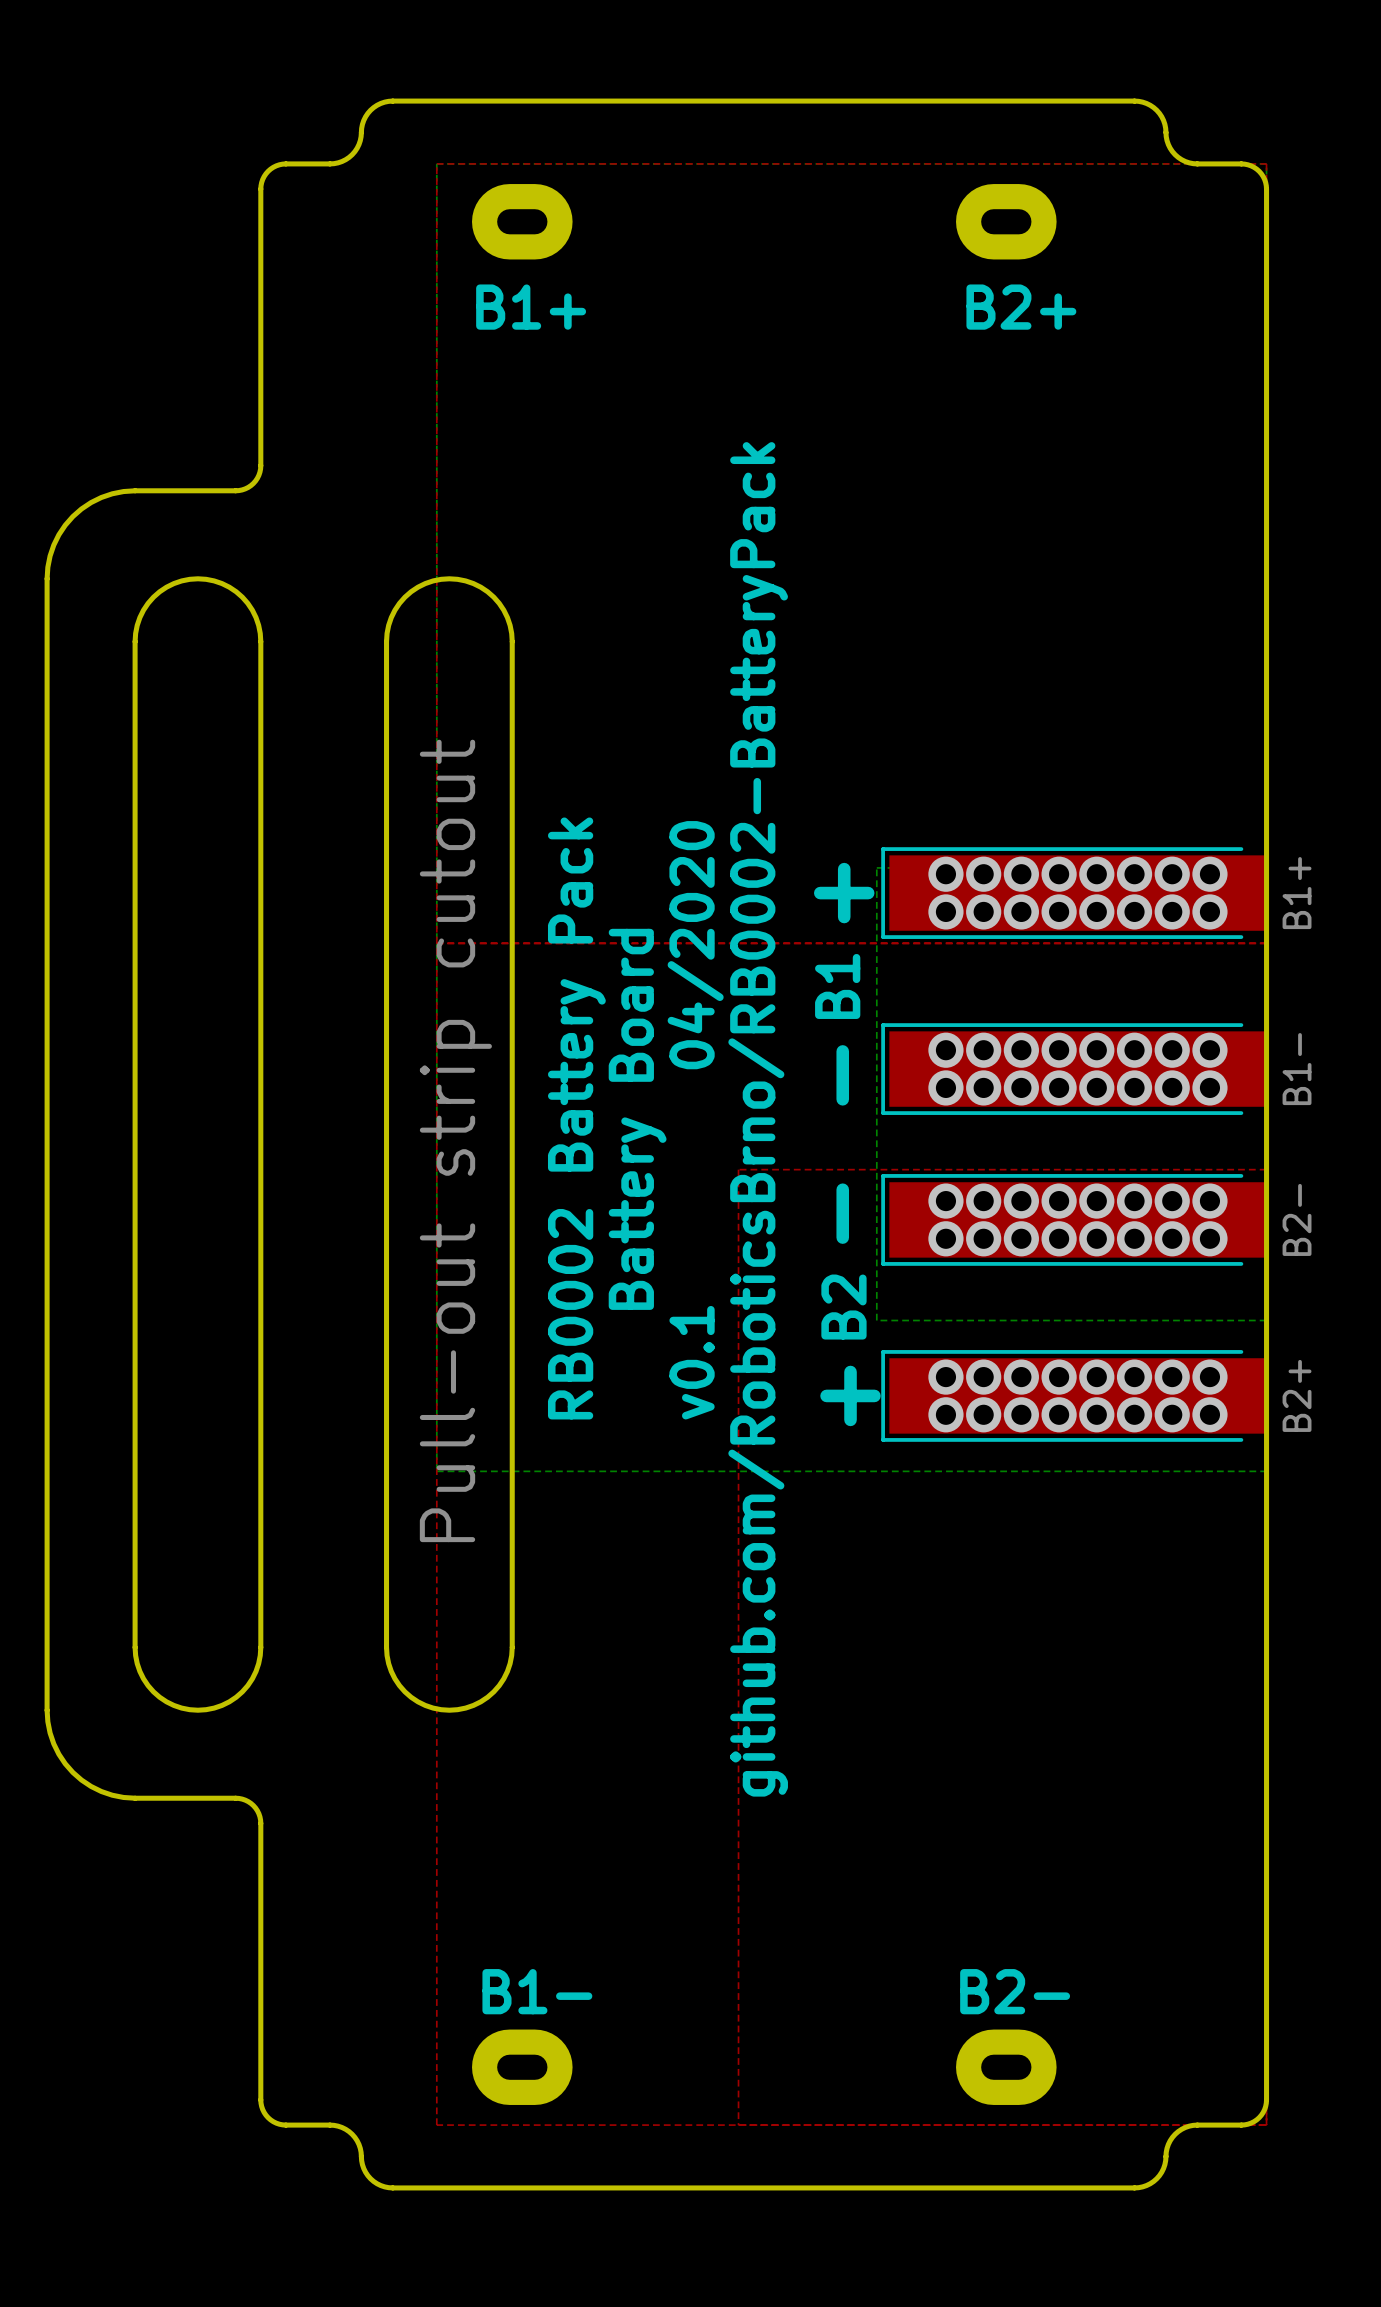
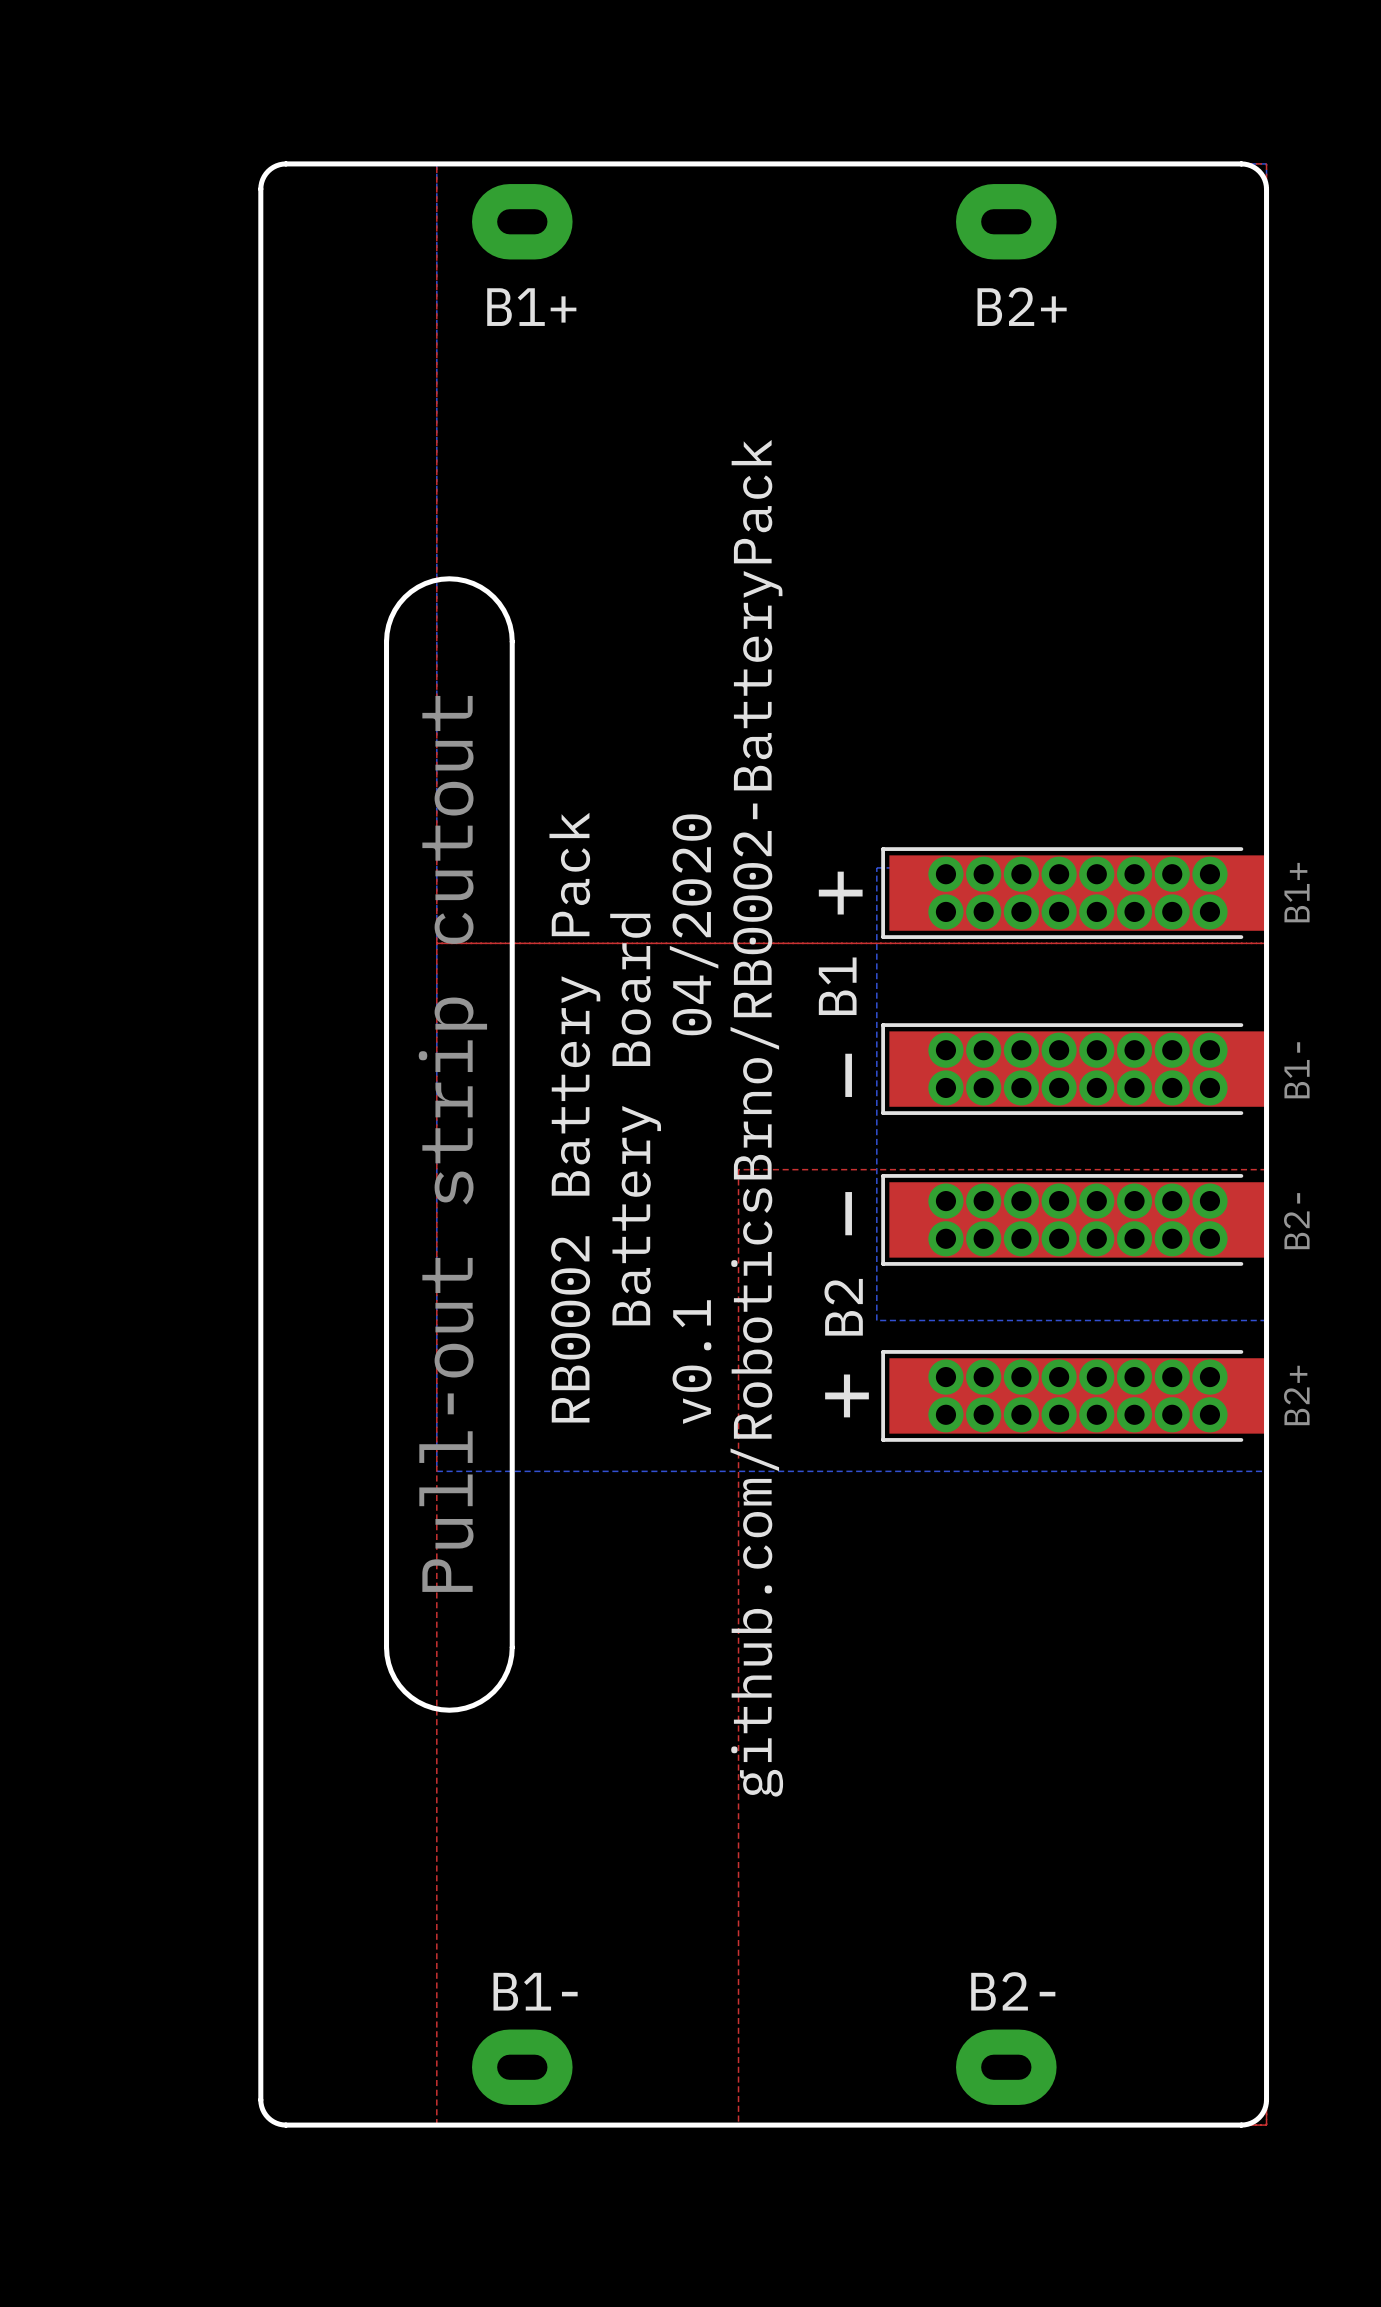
board edge: (329, 163) (341, 161) (352, 154) (358, 144) (362, 124) (367, 113) (377, 105) (392, 101) (1138, 101) (1150, 105) (1159, 113) (1164, 124) (1168, 144) (1175, 154) (1185, 161) (1197, 163) -> (329, 163) (1197, 163)
board edge: (260, 465) (255, 480) (242, 489) (123, 491) (101, 497) (91, 502) (72, 516) (58, 534) (50, 556) (47, 578) (47, 1721) (53, 1743) (65, 1763) (81, 1780) (101, 1791) (112, 1795) (135, 1798) (242, 1799) (255, 1808) (260, 1823) -> (260, 465) (260, 641)
board edge: (260, 641) (256, 617) (242, 597) (222, 583) (197, 578) (173, 583) (153, 597) (139, 617) (135, 641) (135, 1655) (143, 1678) (159, 1697) (181, 1708) (197, 1710) (222, 1705) (242, 1691) (256, 1671) (260, 1647) -> (260, 1823) (260, 1647)
board edge: (329, 2125) (341, 2127) (352, 2134) (358, 2144) (362, 2164) (367, 2175) (377, 2183) (392, 2187) (1138, 2187) (1150, 2183) (1159, 2175) (1164, 2164) (1168, 2144) (1175, 2134) (1185, 2127) (1197, 2125) -> (329, 2125) (1197, 2125)

